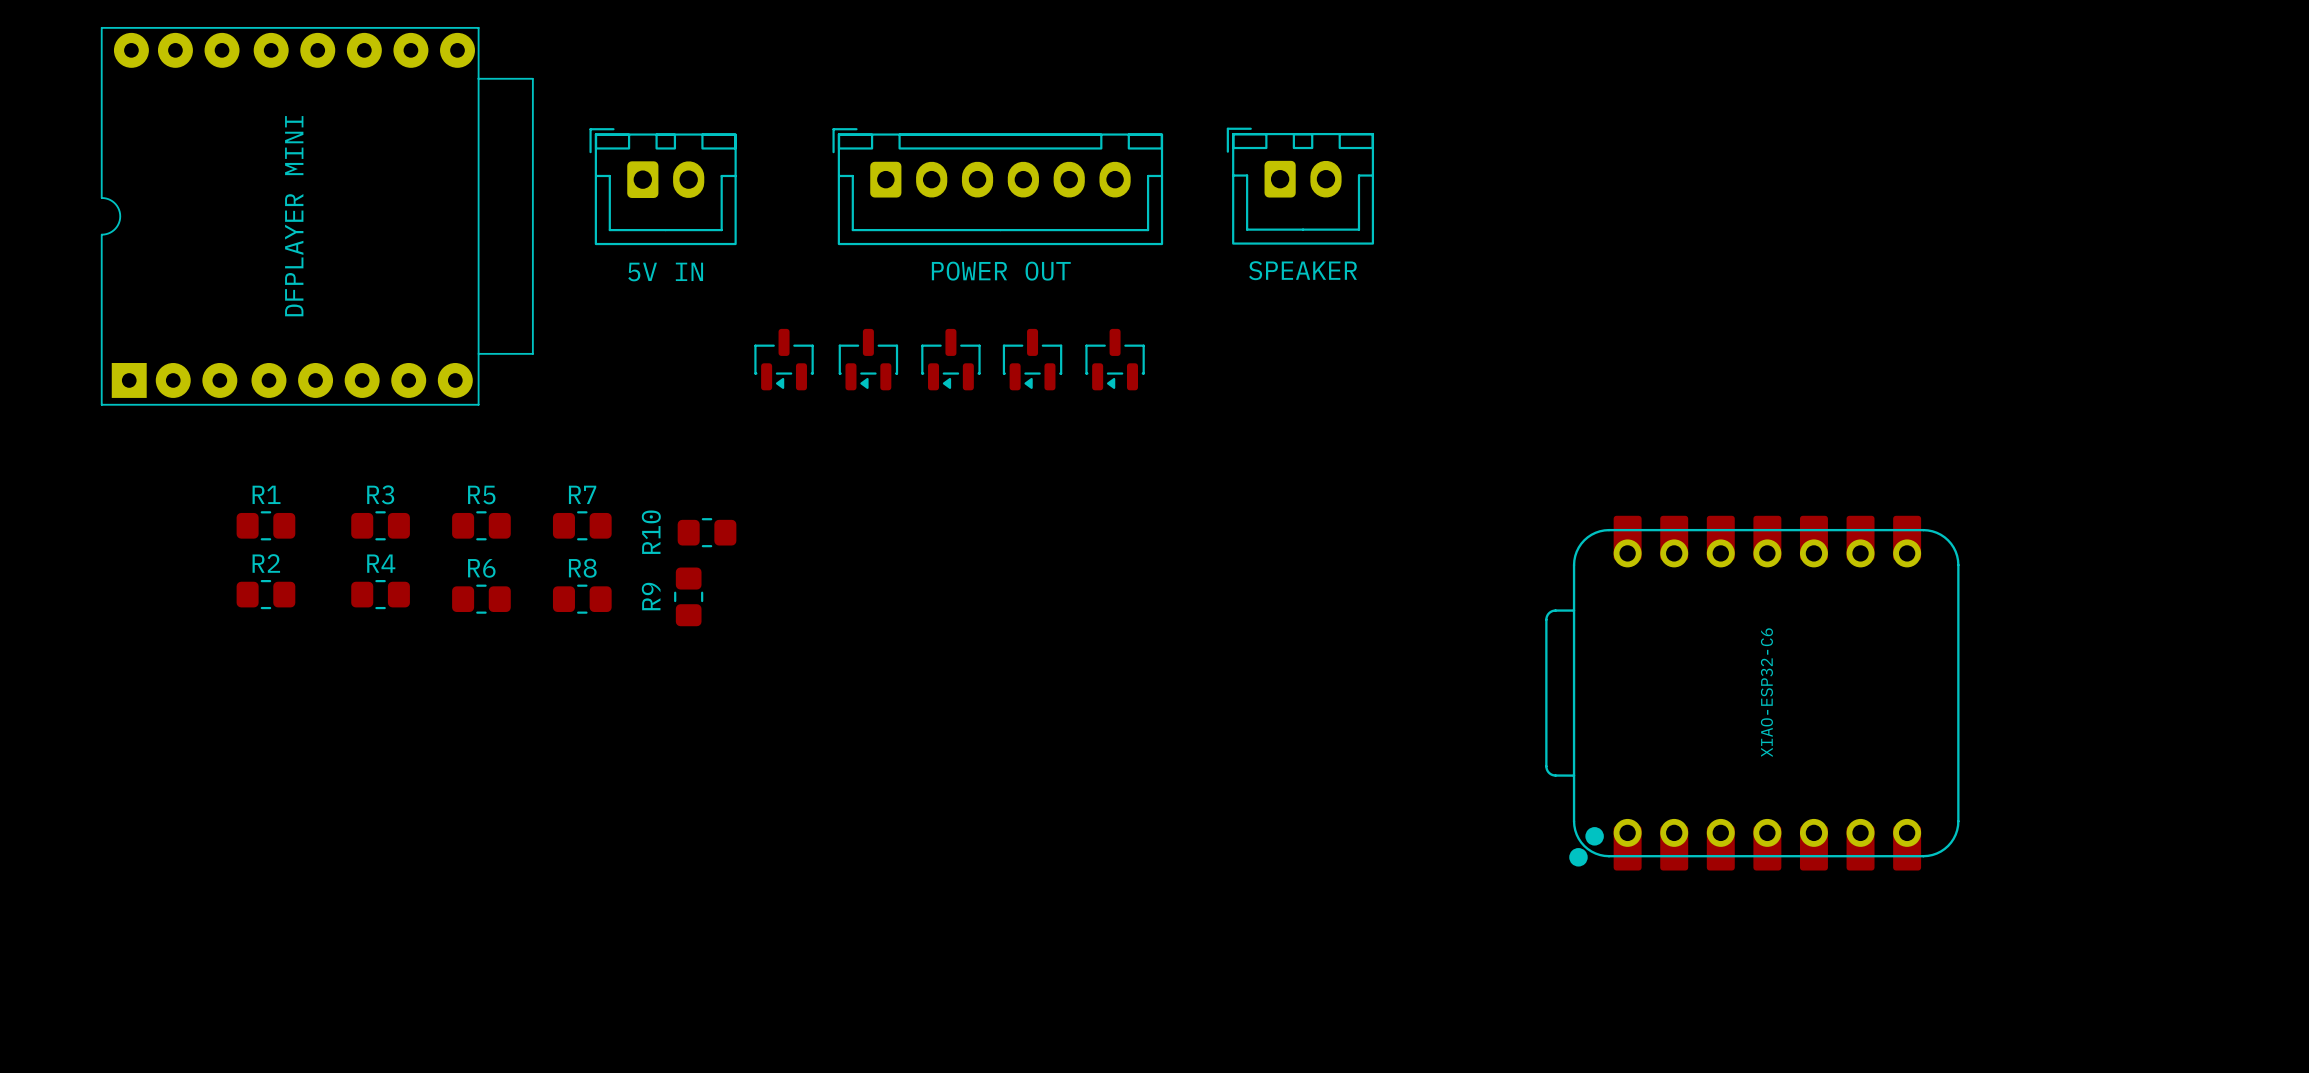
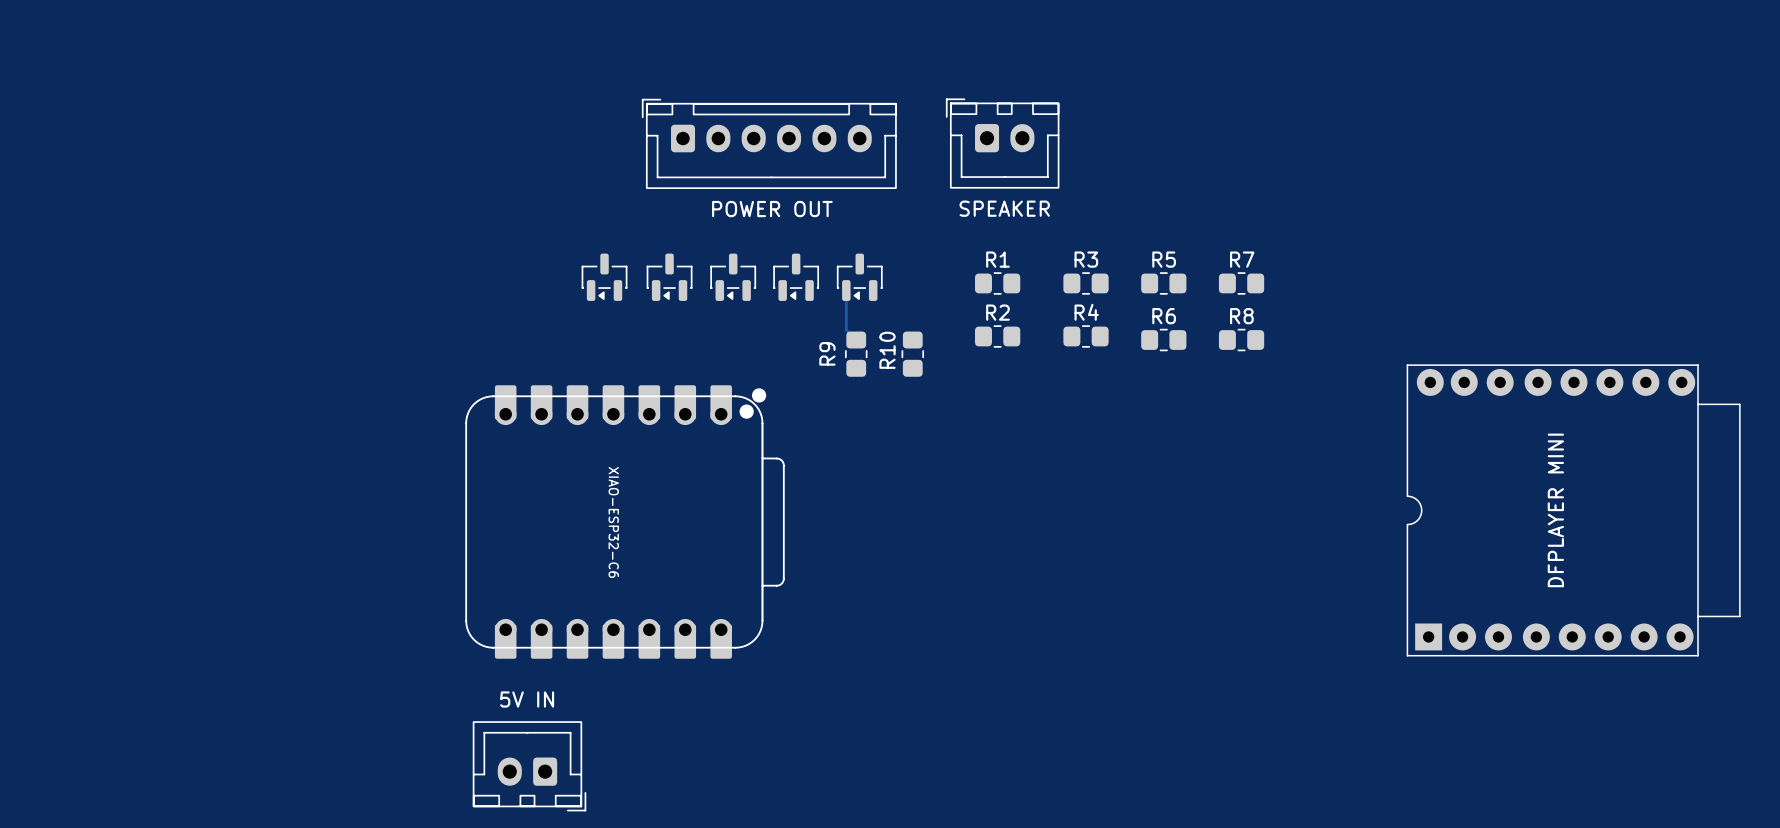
part: 5V IN (663, 186) -> none
part: DFPLAYER MINI (317, 216) -> none
track: none -> (846, 290) (846, 330) (856, 340)
R1 position: (265, 525) -> (997, 283)
R3 position: (380, 525) -> (1086, 283)
R5 position: (481, 525) -> (1163, 283)
R7 position: (582, 525) -> (1241, 283)
R10 rotation: 0° (707, 532) -> 90° clockwise (912, 354)
R10 position: (707, 532) -> (912, 354)
R2 position: (265, 594) -> (997, 336)
R4 position: (380, 594) -> (1086, 336)
R9 position: (688, 596) -> (856, 354)
R6 position: (481, 599) -> (1163, 340)
R8 position: (582, 599) -> (1241, 340)
part: none -> DFPLAYER MINI (1573, 510)
part: none -> XIAO-ESP32-C6 (625, 522)
part: XIAO-ESP32-C6 (1752, 693) -> none
part: none -> 5V IN (529, 766)

